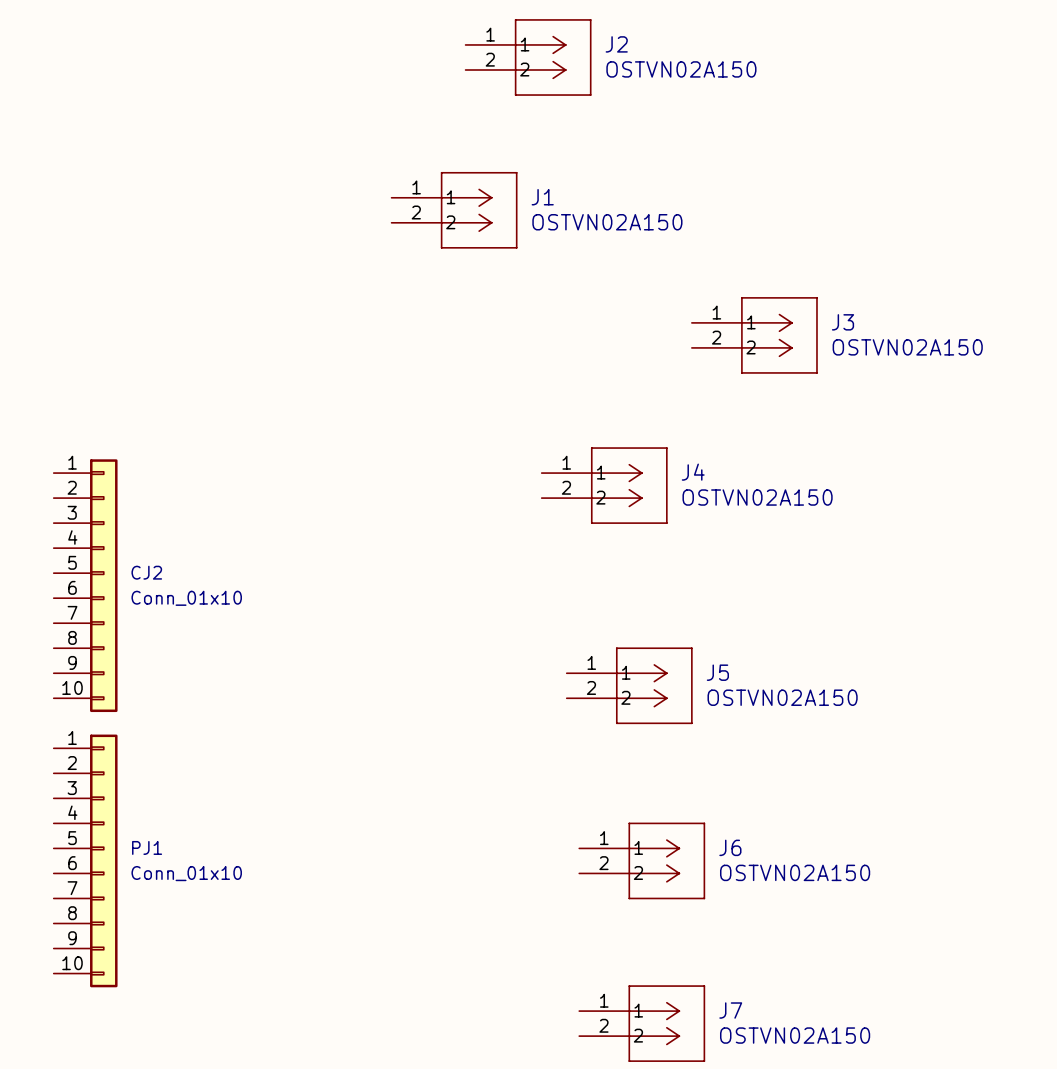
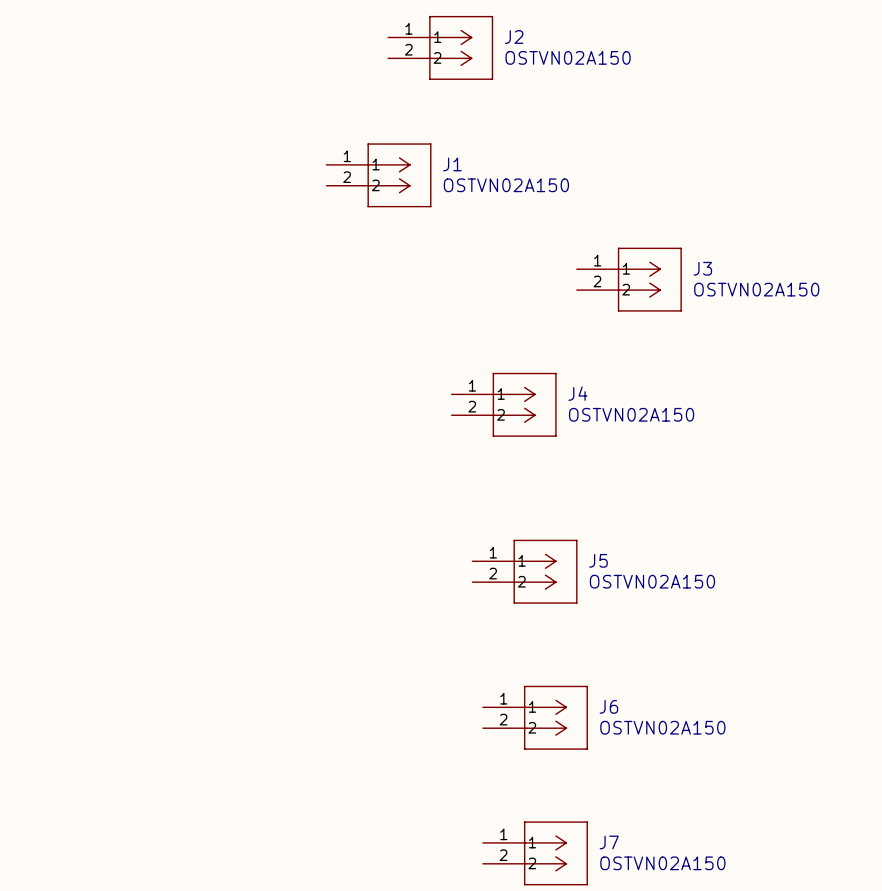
CJ2: Conn_01x10 (85, 585) -> none
PJ1: Conn_01x10 (85, 860) -> none

